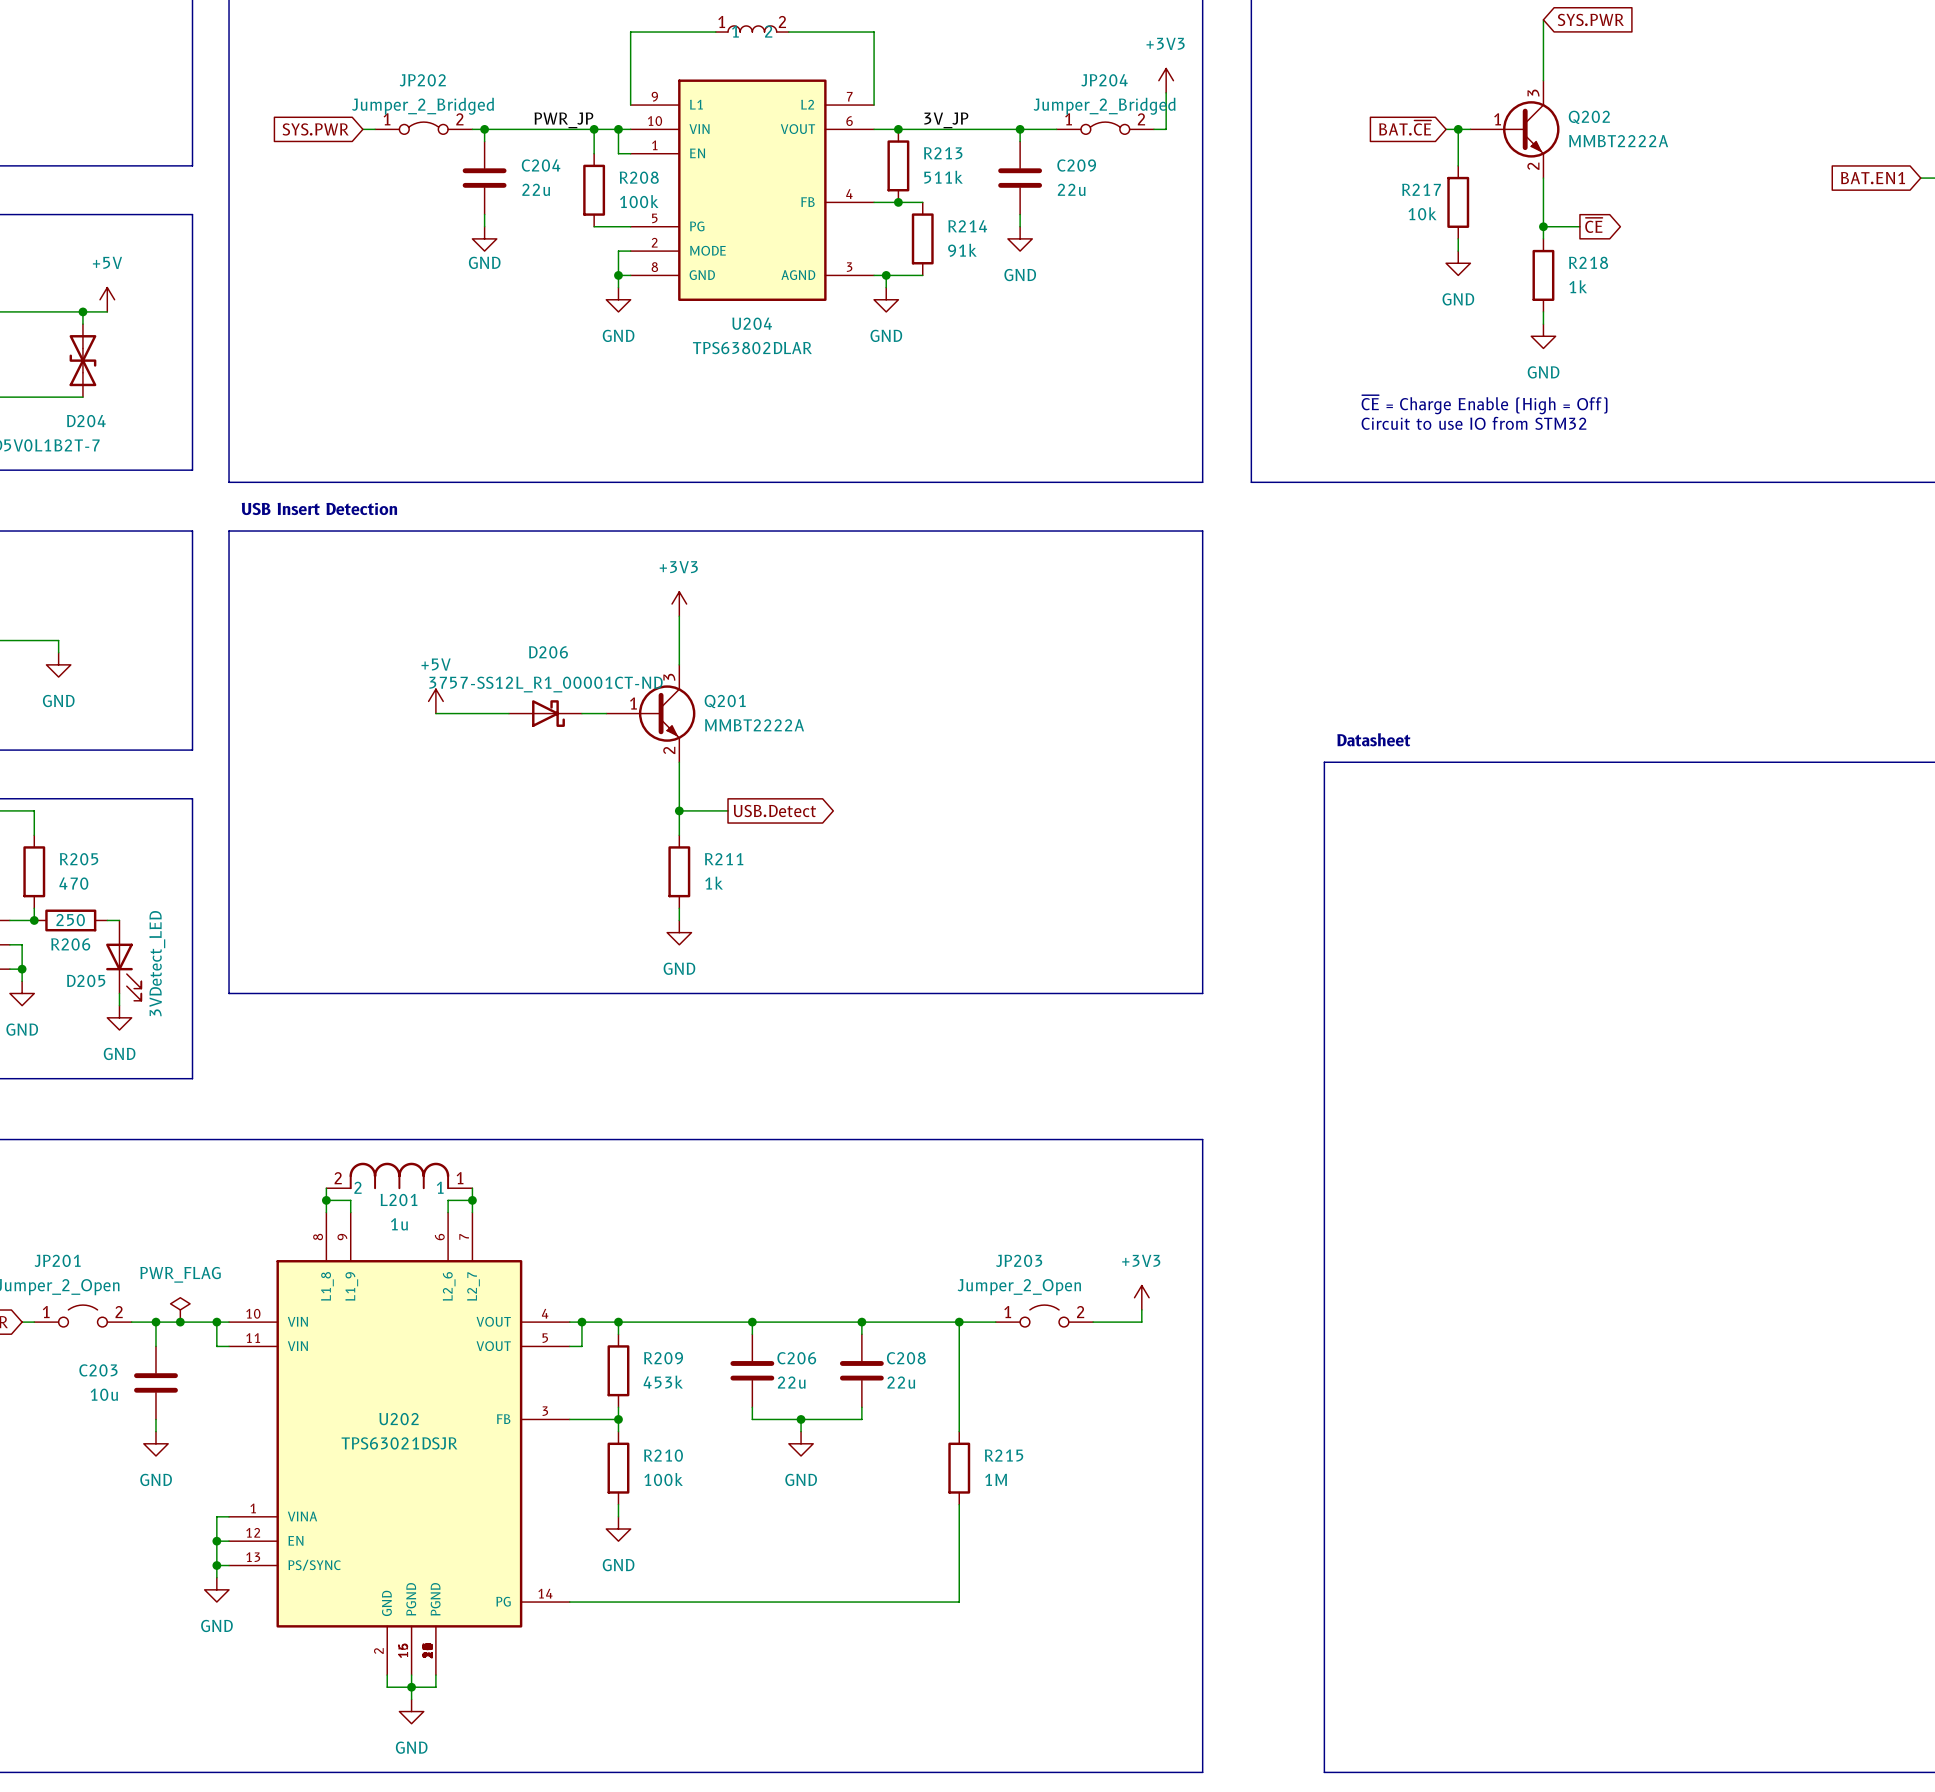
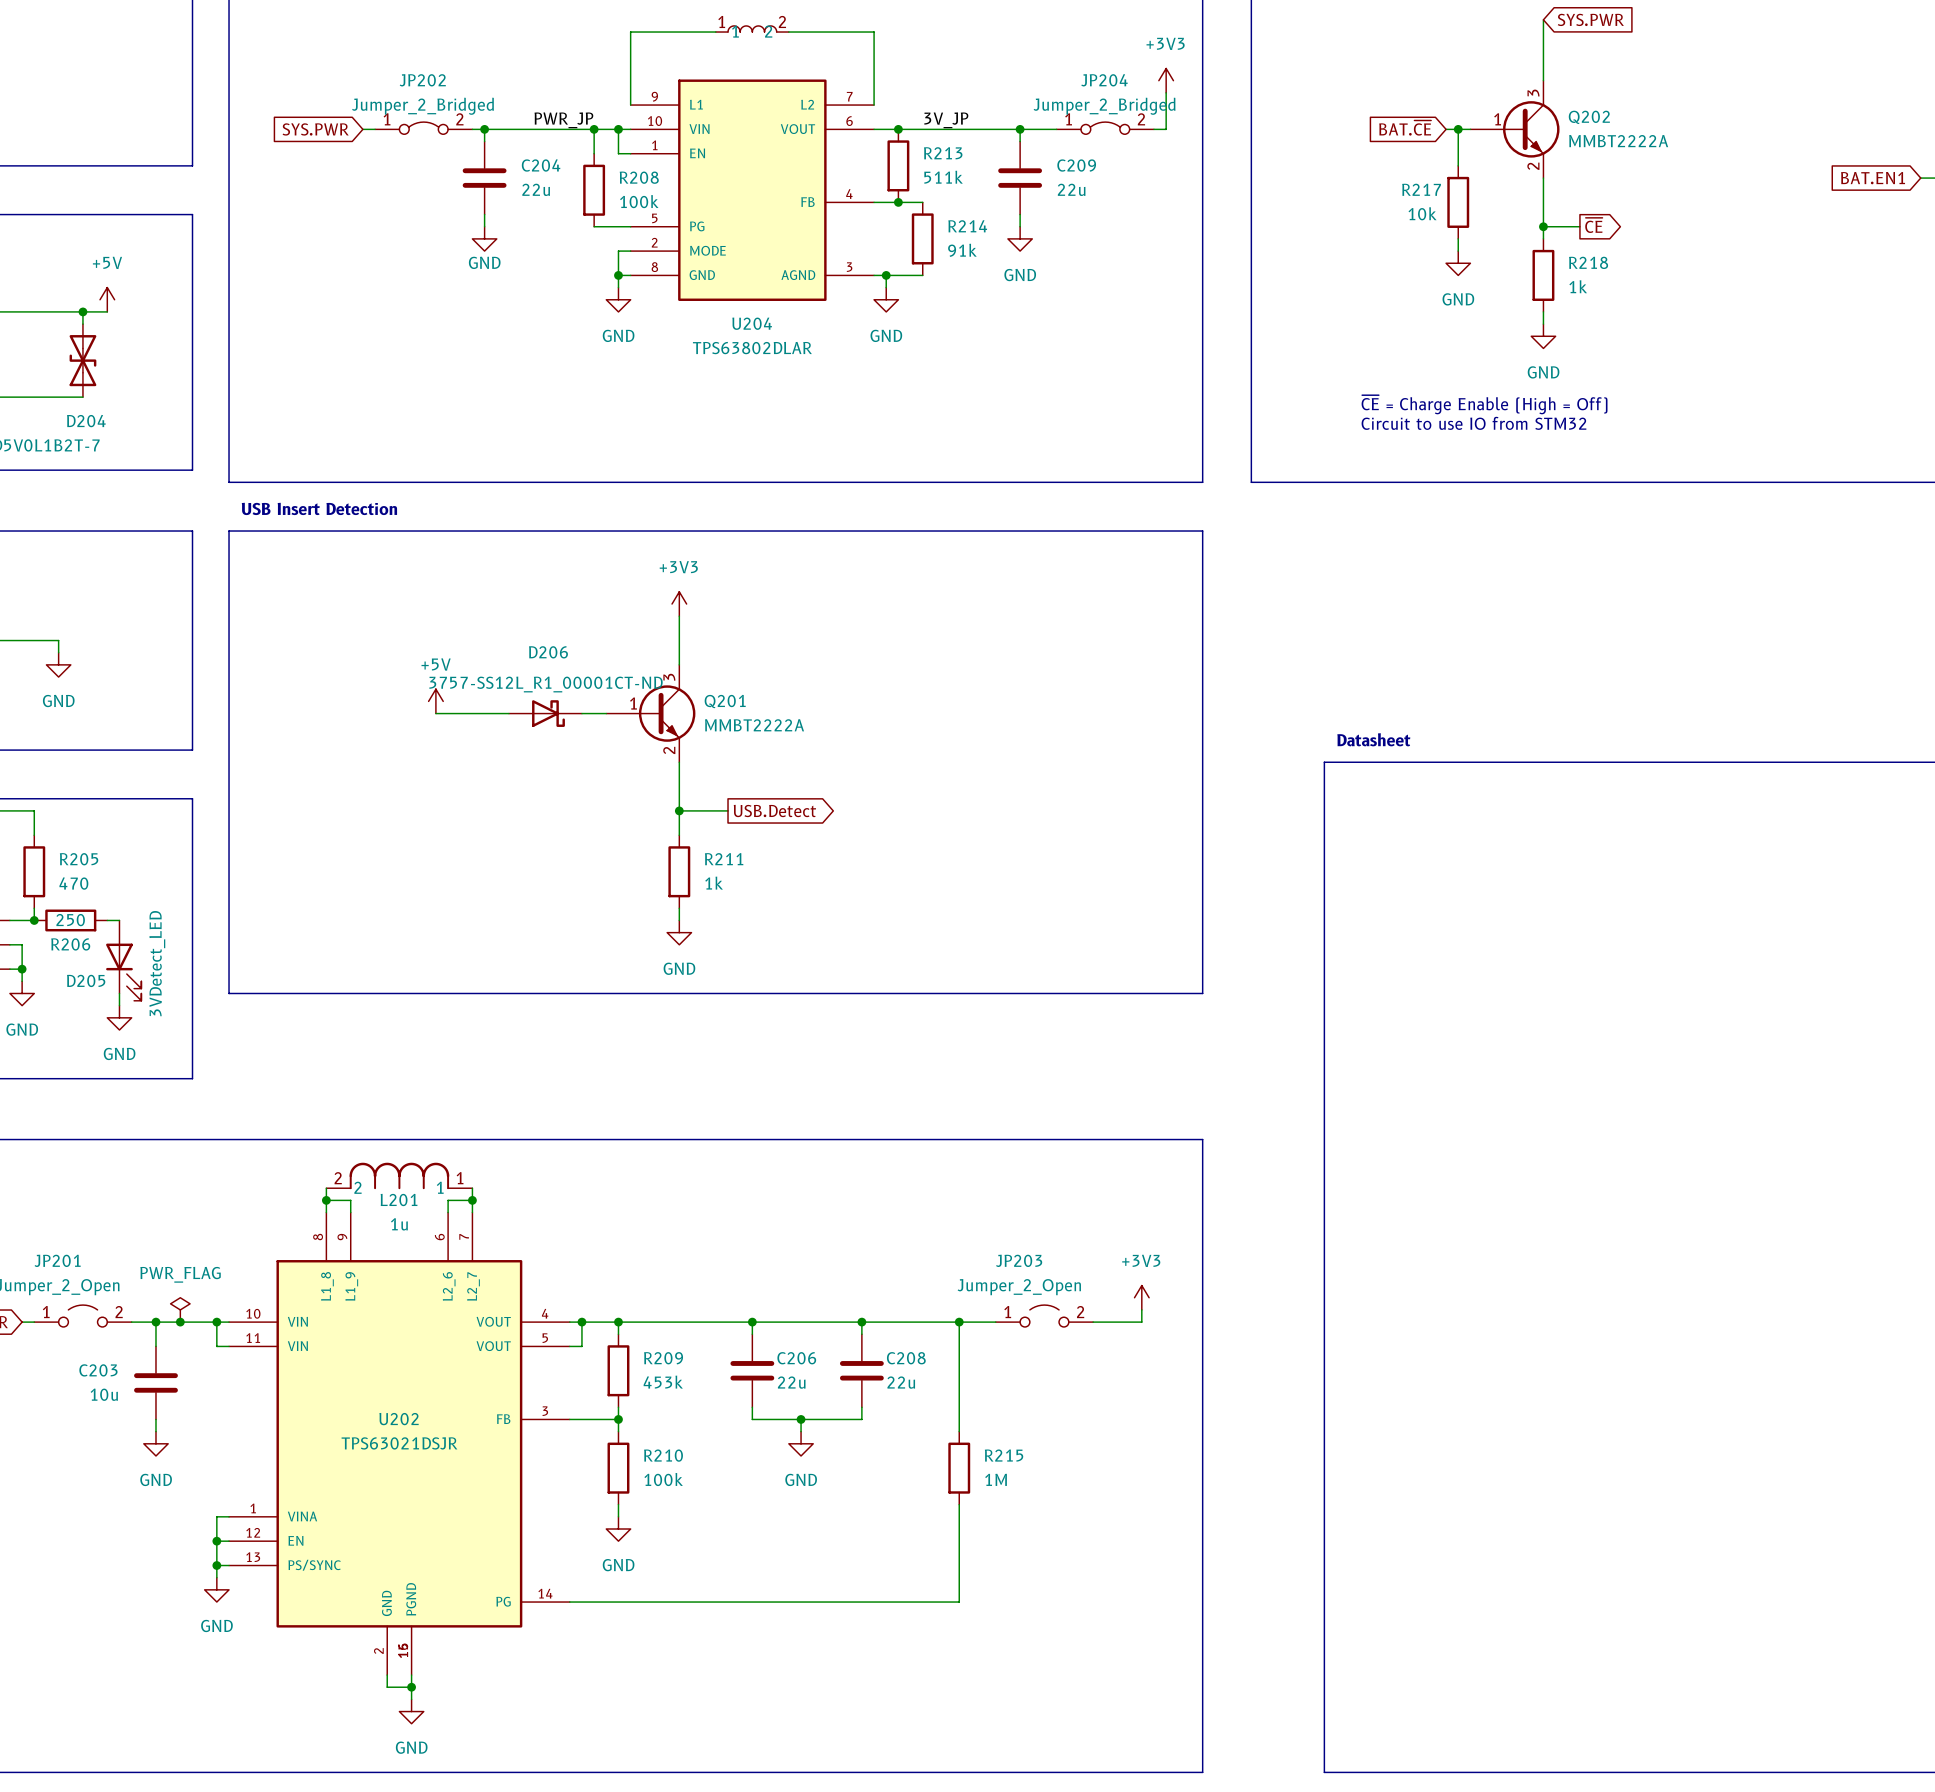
U202 symbol: [229, 1212, 570, 1676] -> [229, 1212, 570, 1676]
wire: (435, 1675) (435, 1687) (411, 1687) -> none

